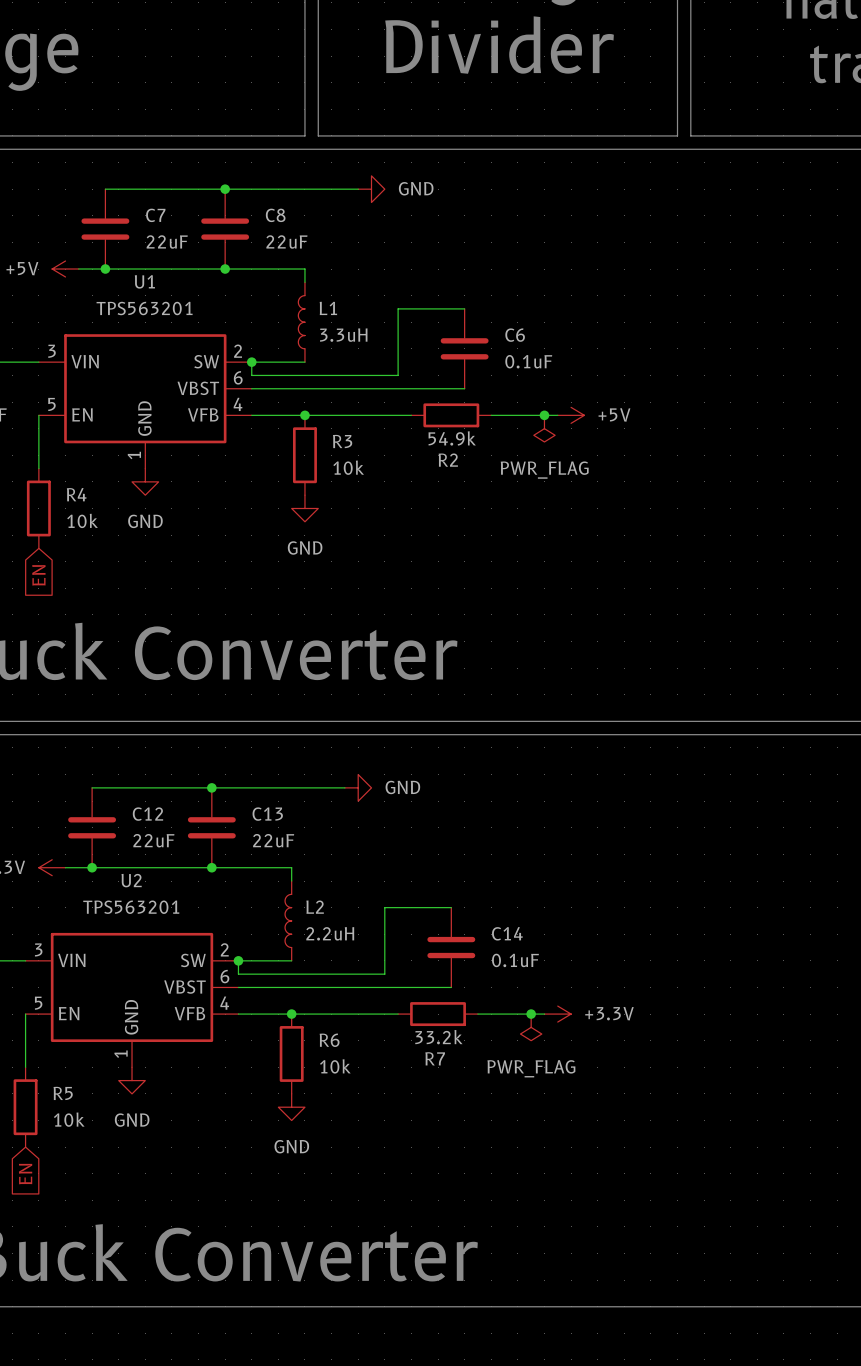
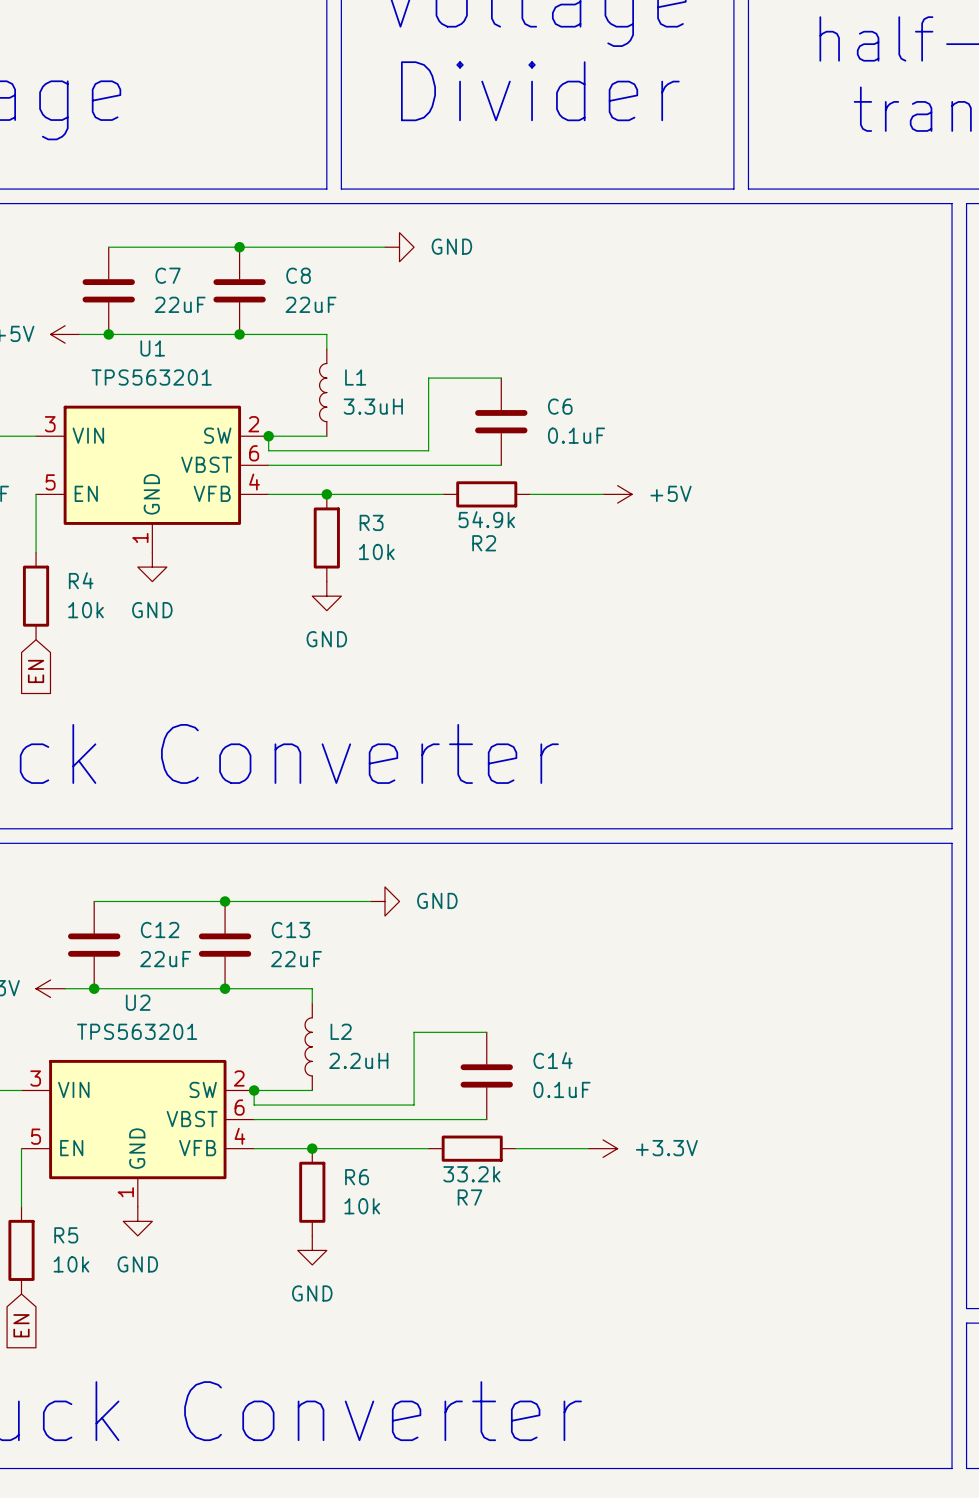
junction: (544, 415) -> none
power symbol: PWR_FLAG (544, 428) -> none
junction: (531, 1014) -> none
power symbol: PWR_FLAG (531, 1027) -> none

